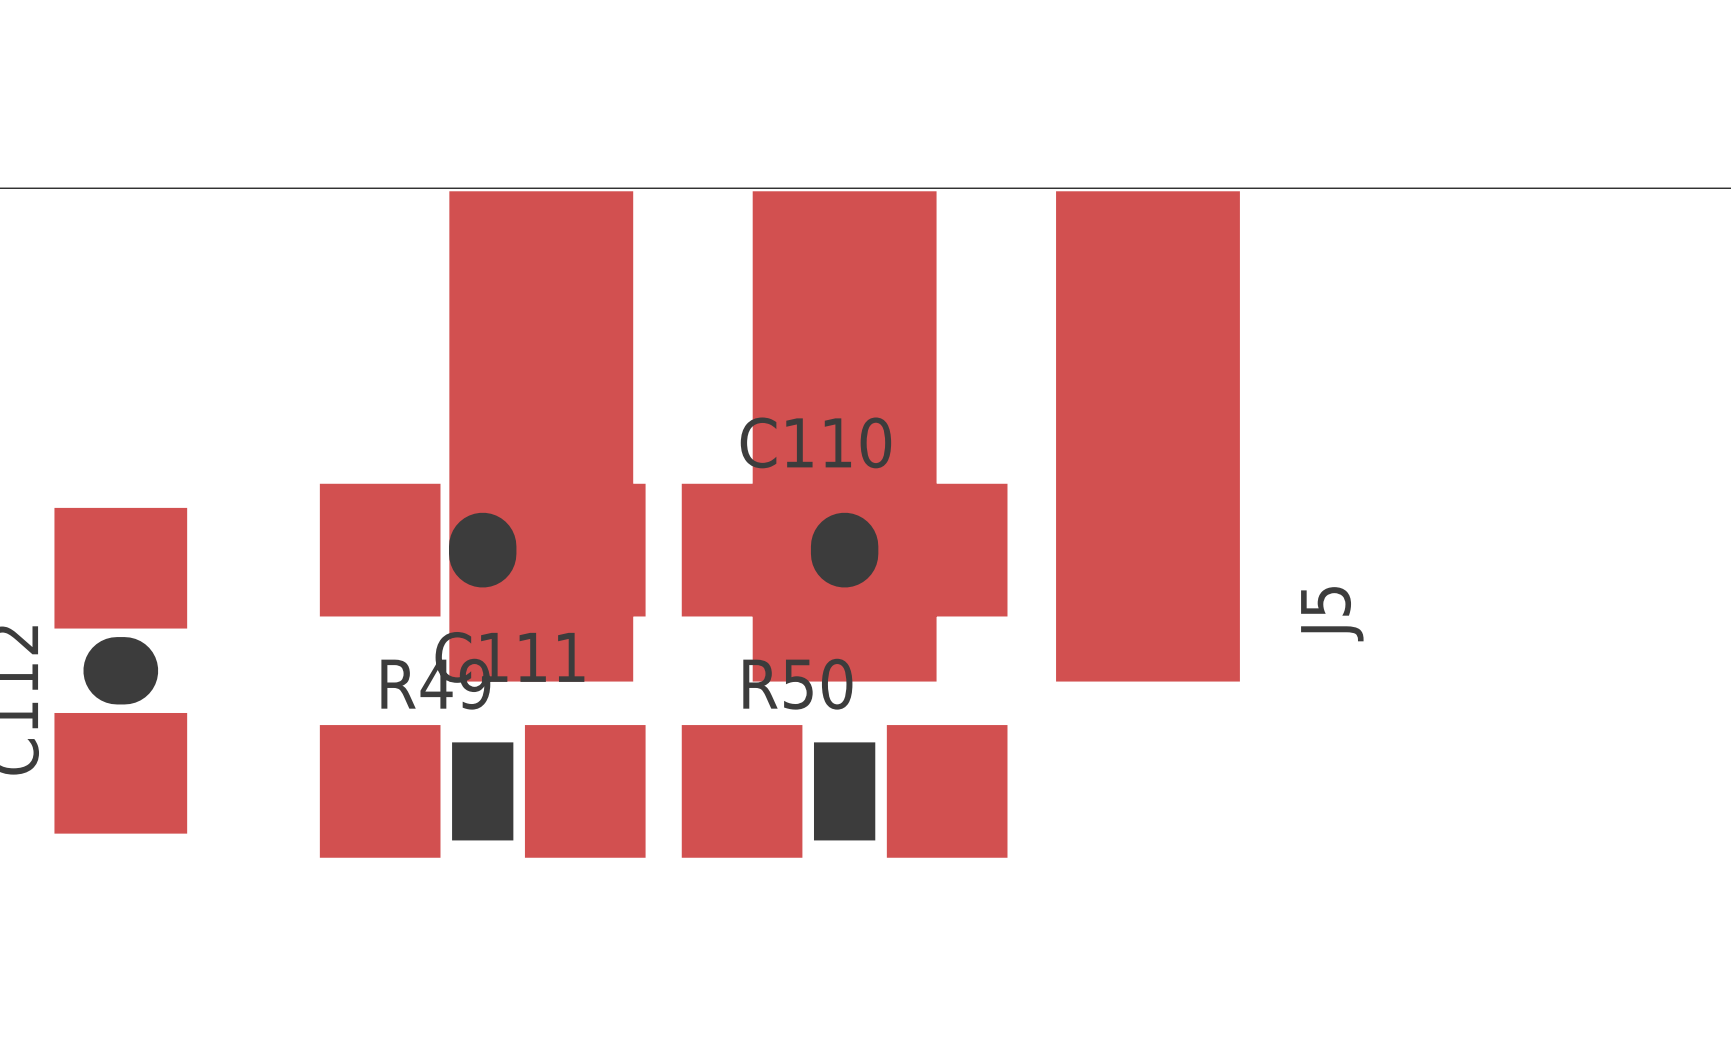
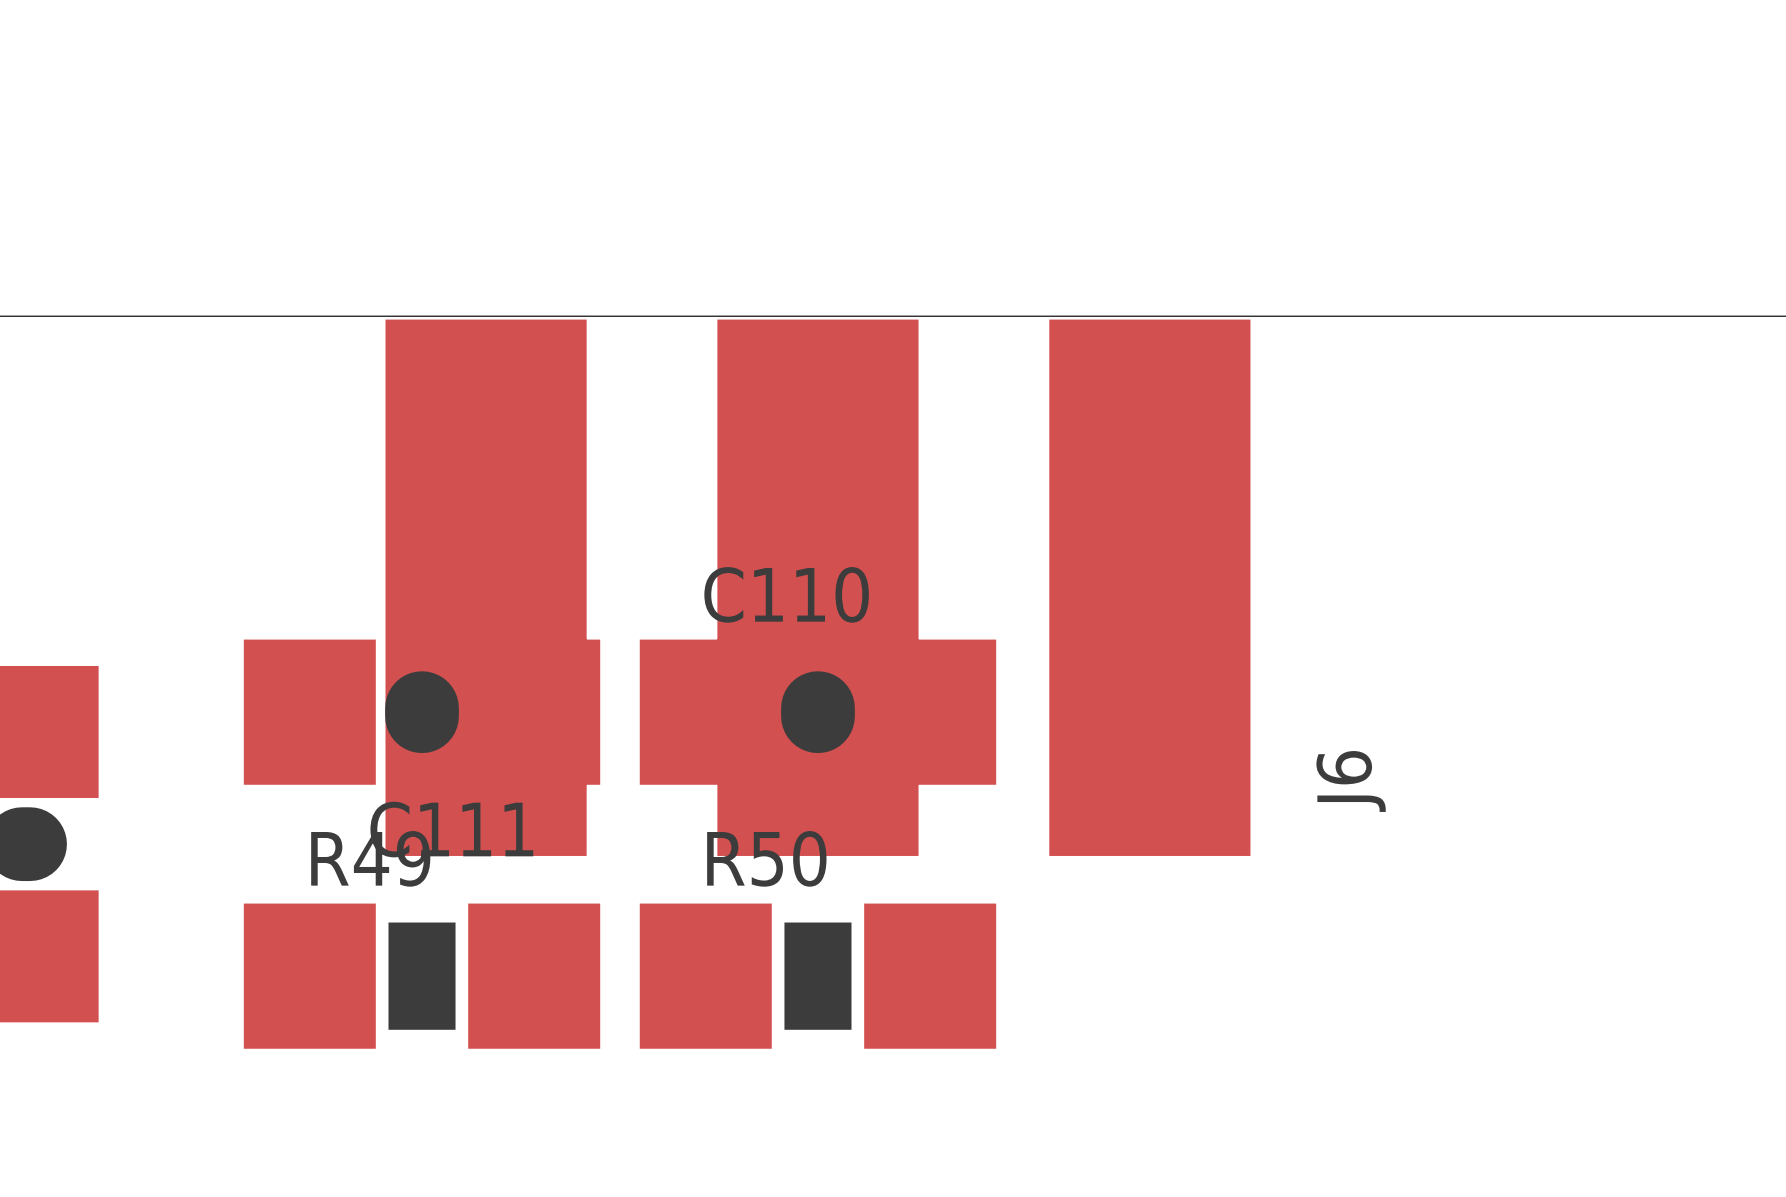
J5 name: J5 (1332, 614) -> J6 (1351, 781)

